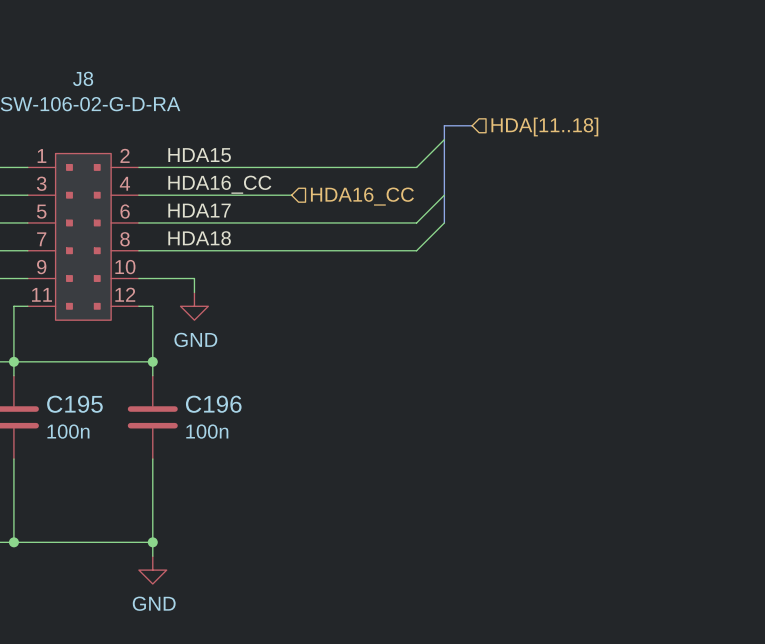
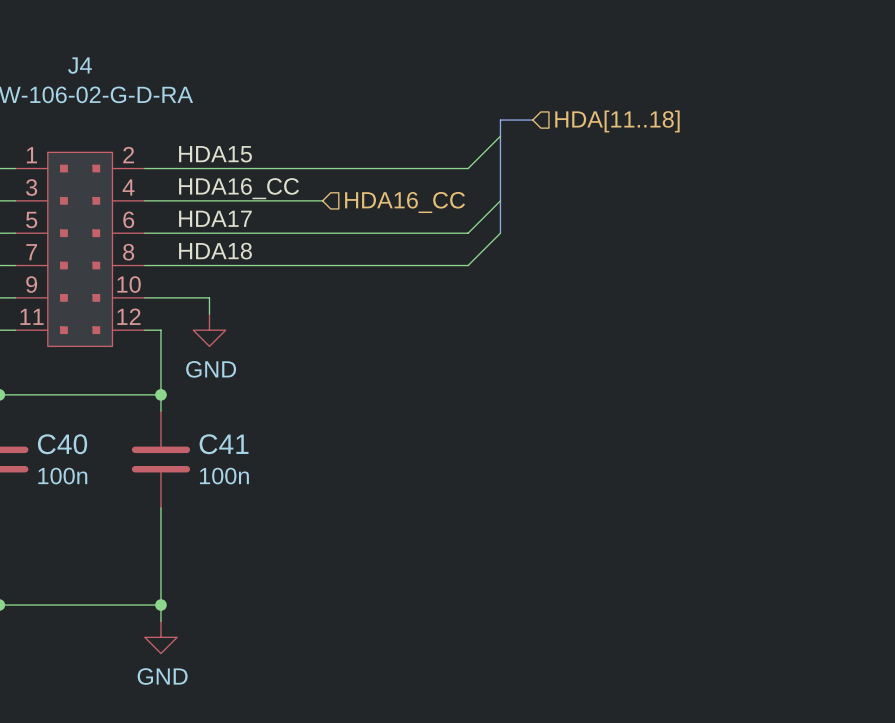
J8 name: J8 (83, 78) -> J4 (79, 65)
C195 name: C195 (74, 404) -> C40 (62, 444)
C196 name: C196 (213, 404) -> C41 (224, 444)

